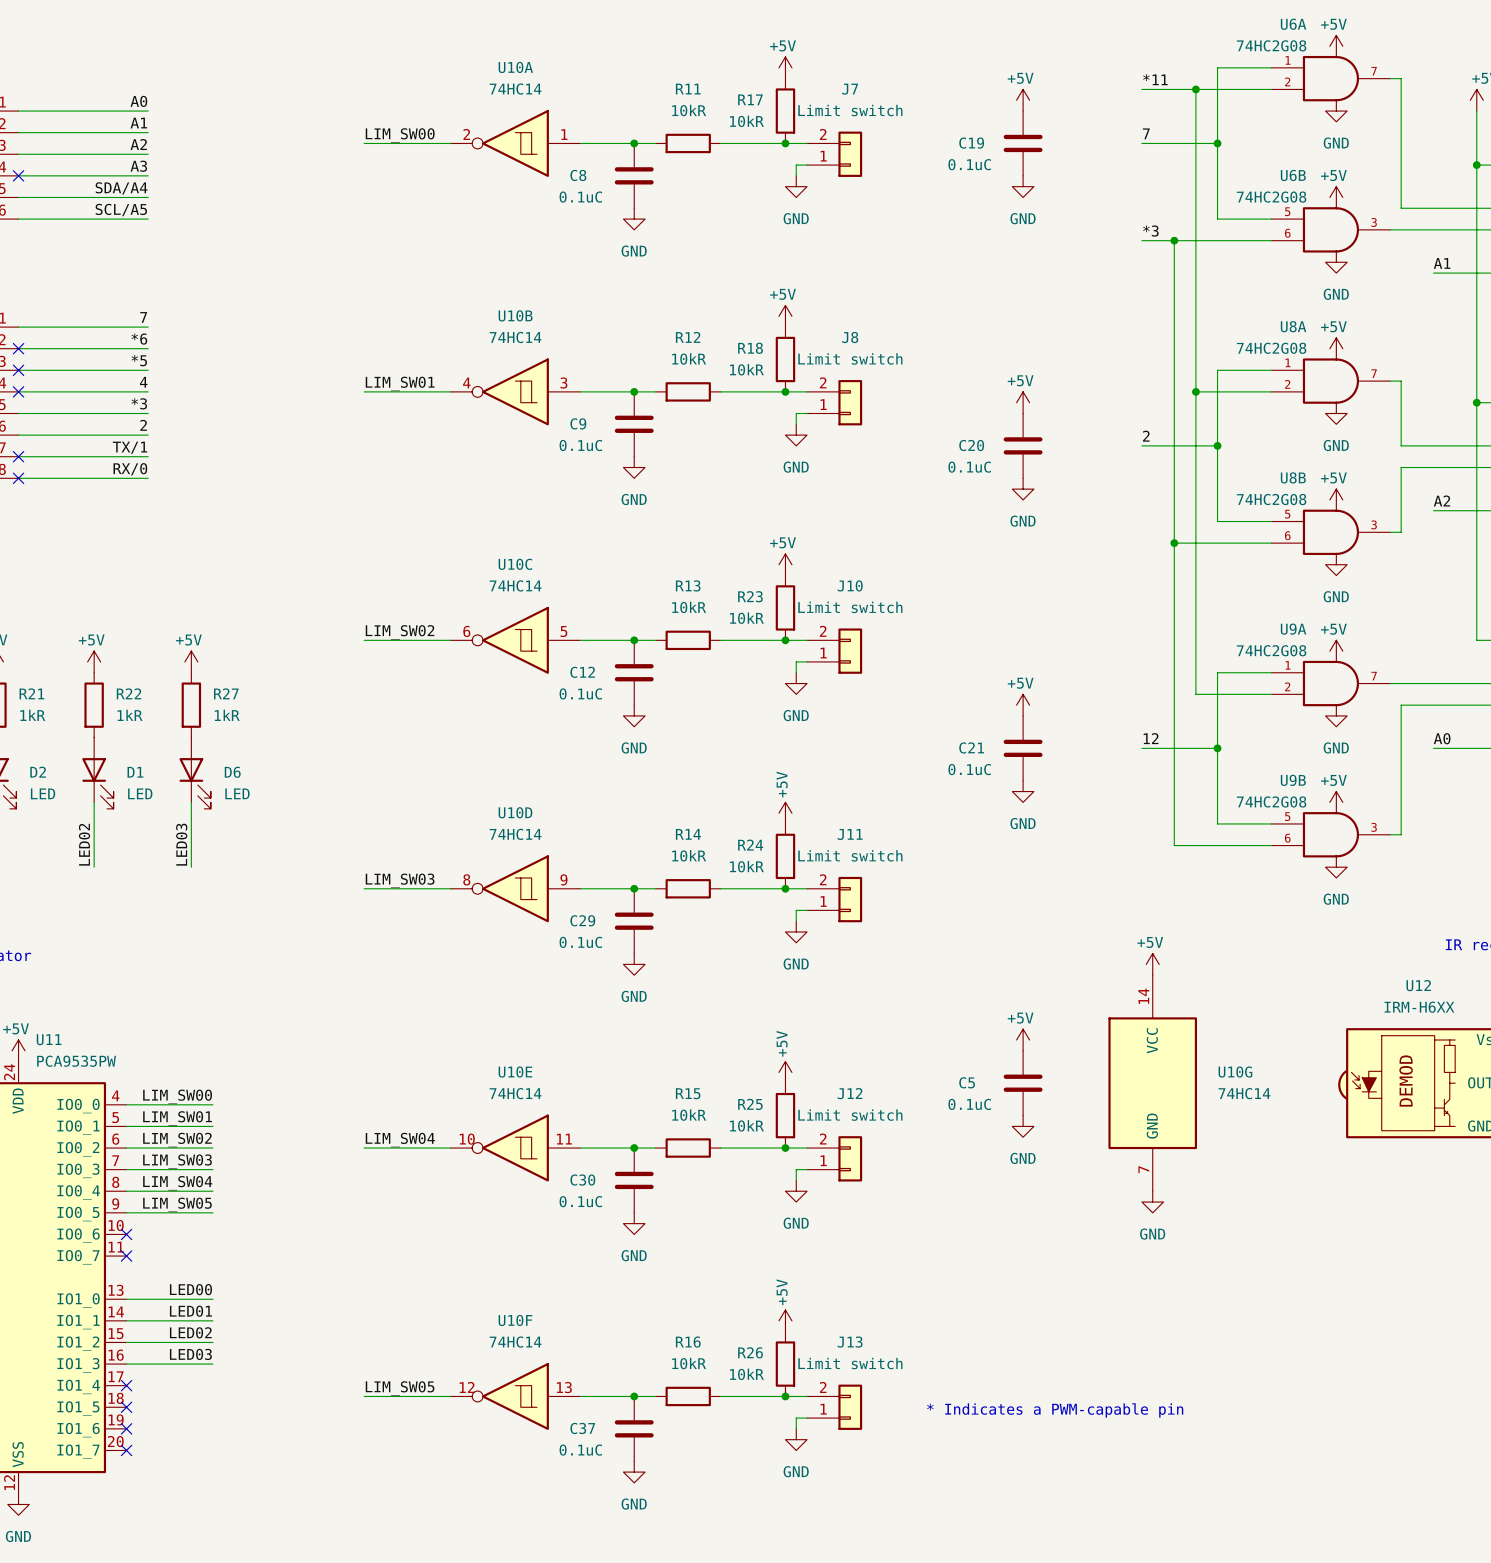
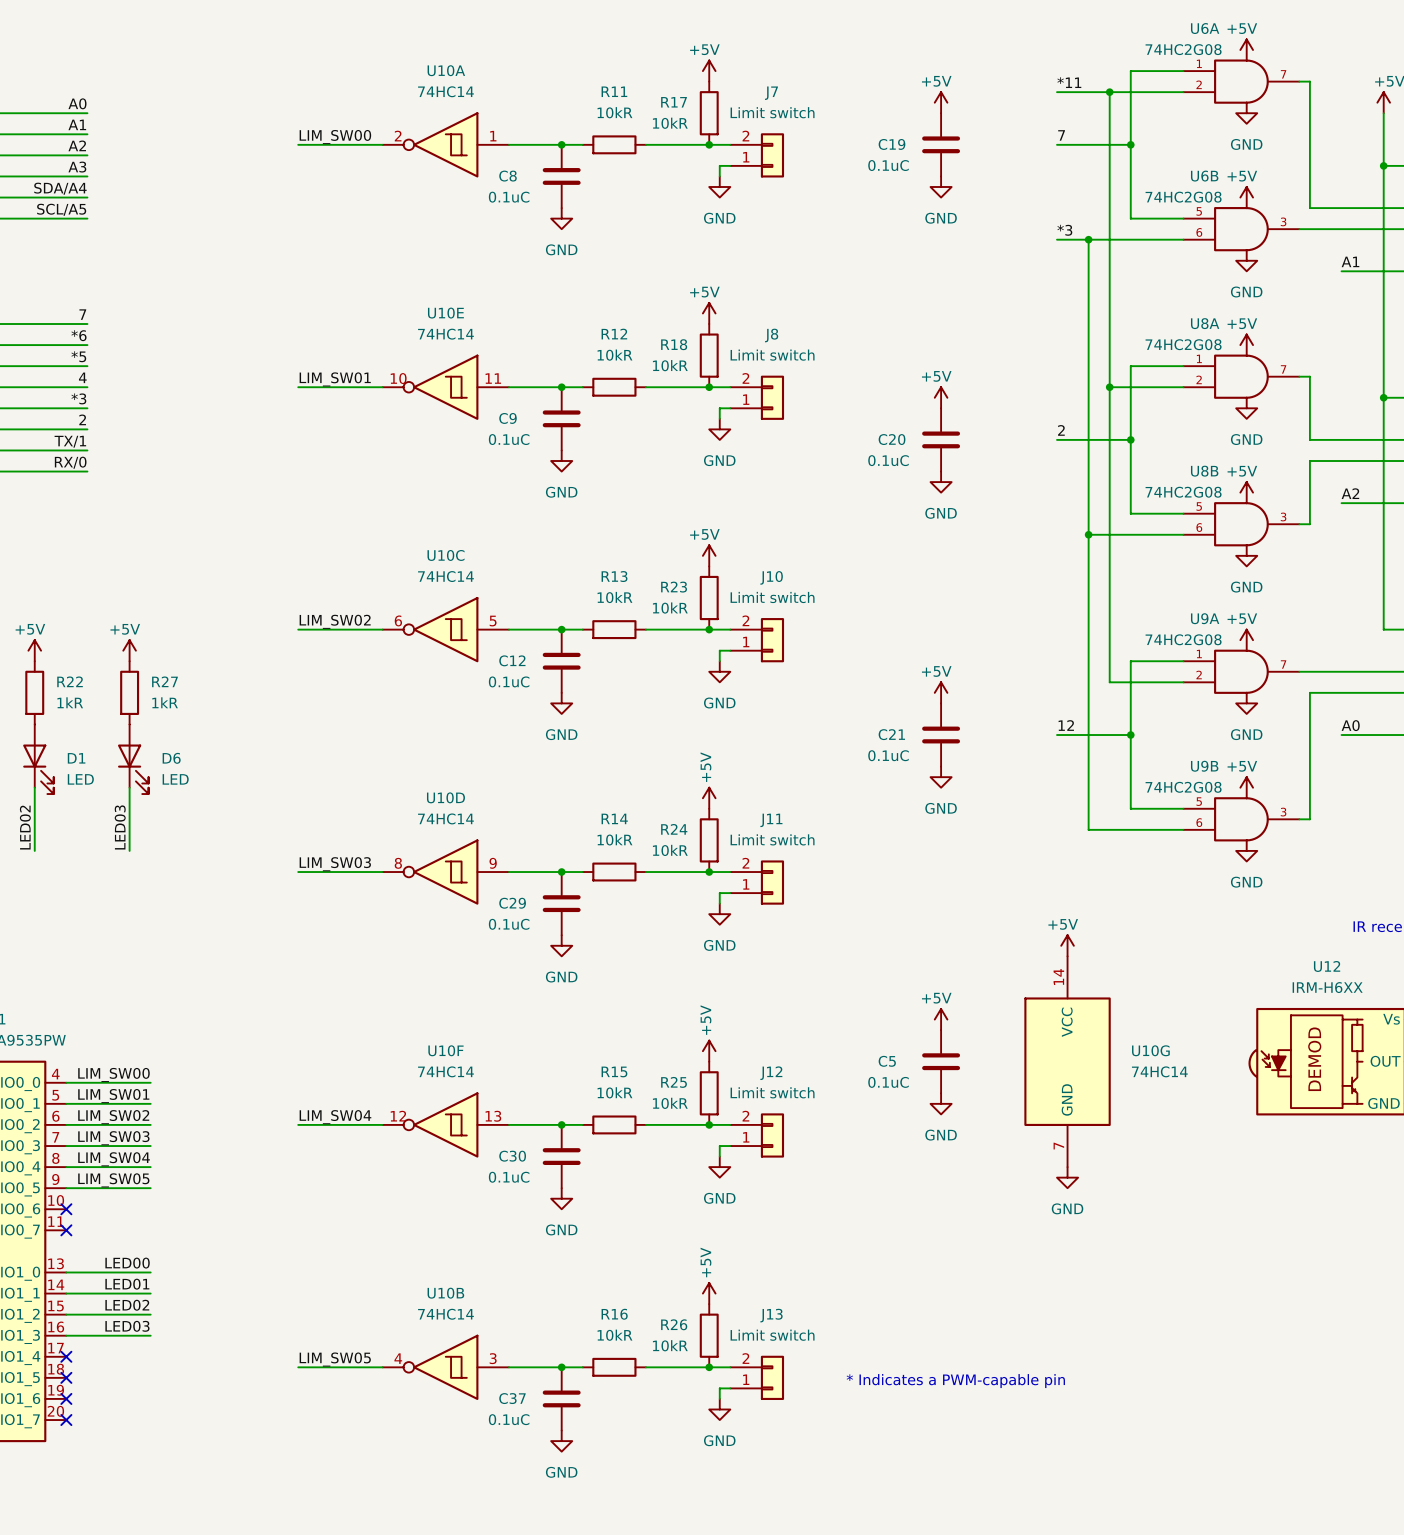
U10B position: (515, 391) -> (445, 1367)
U10E position: (515, 1148) -> (445, 387)
U10F position: (515, 1396) -> (445, 1124)

